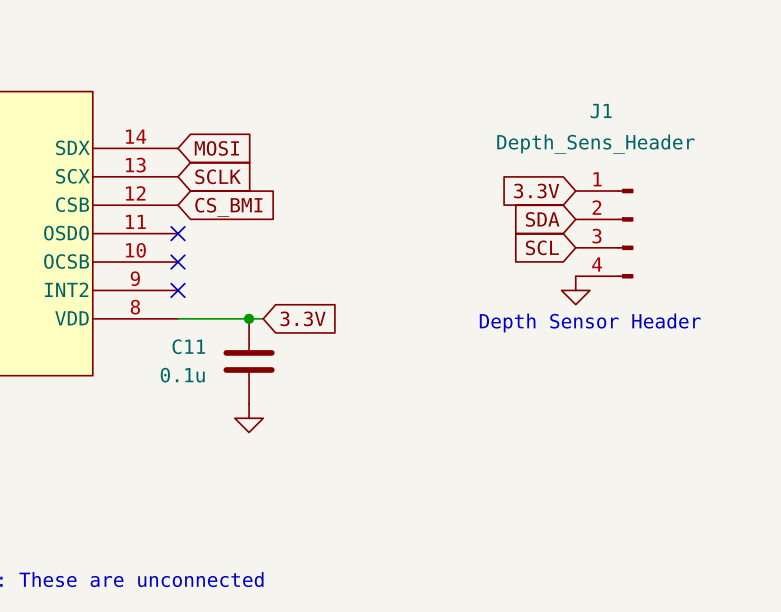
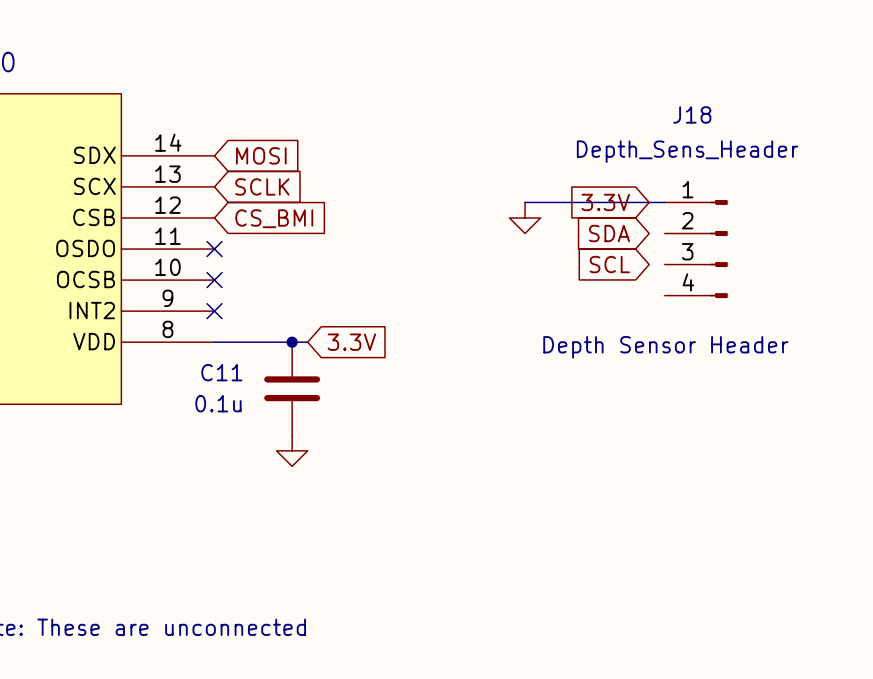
wire: none -> (525, 202) (664, 202)
J1: Depth_Sens_Header (604, 233) -> none
J18: none -> Depth_Sens_Header (696, 249)
power symbol position: (575, 290) -> (525, 217)

